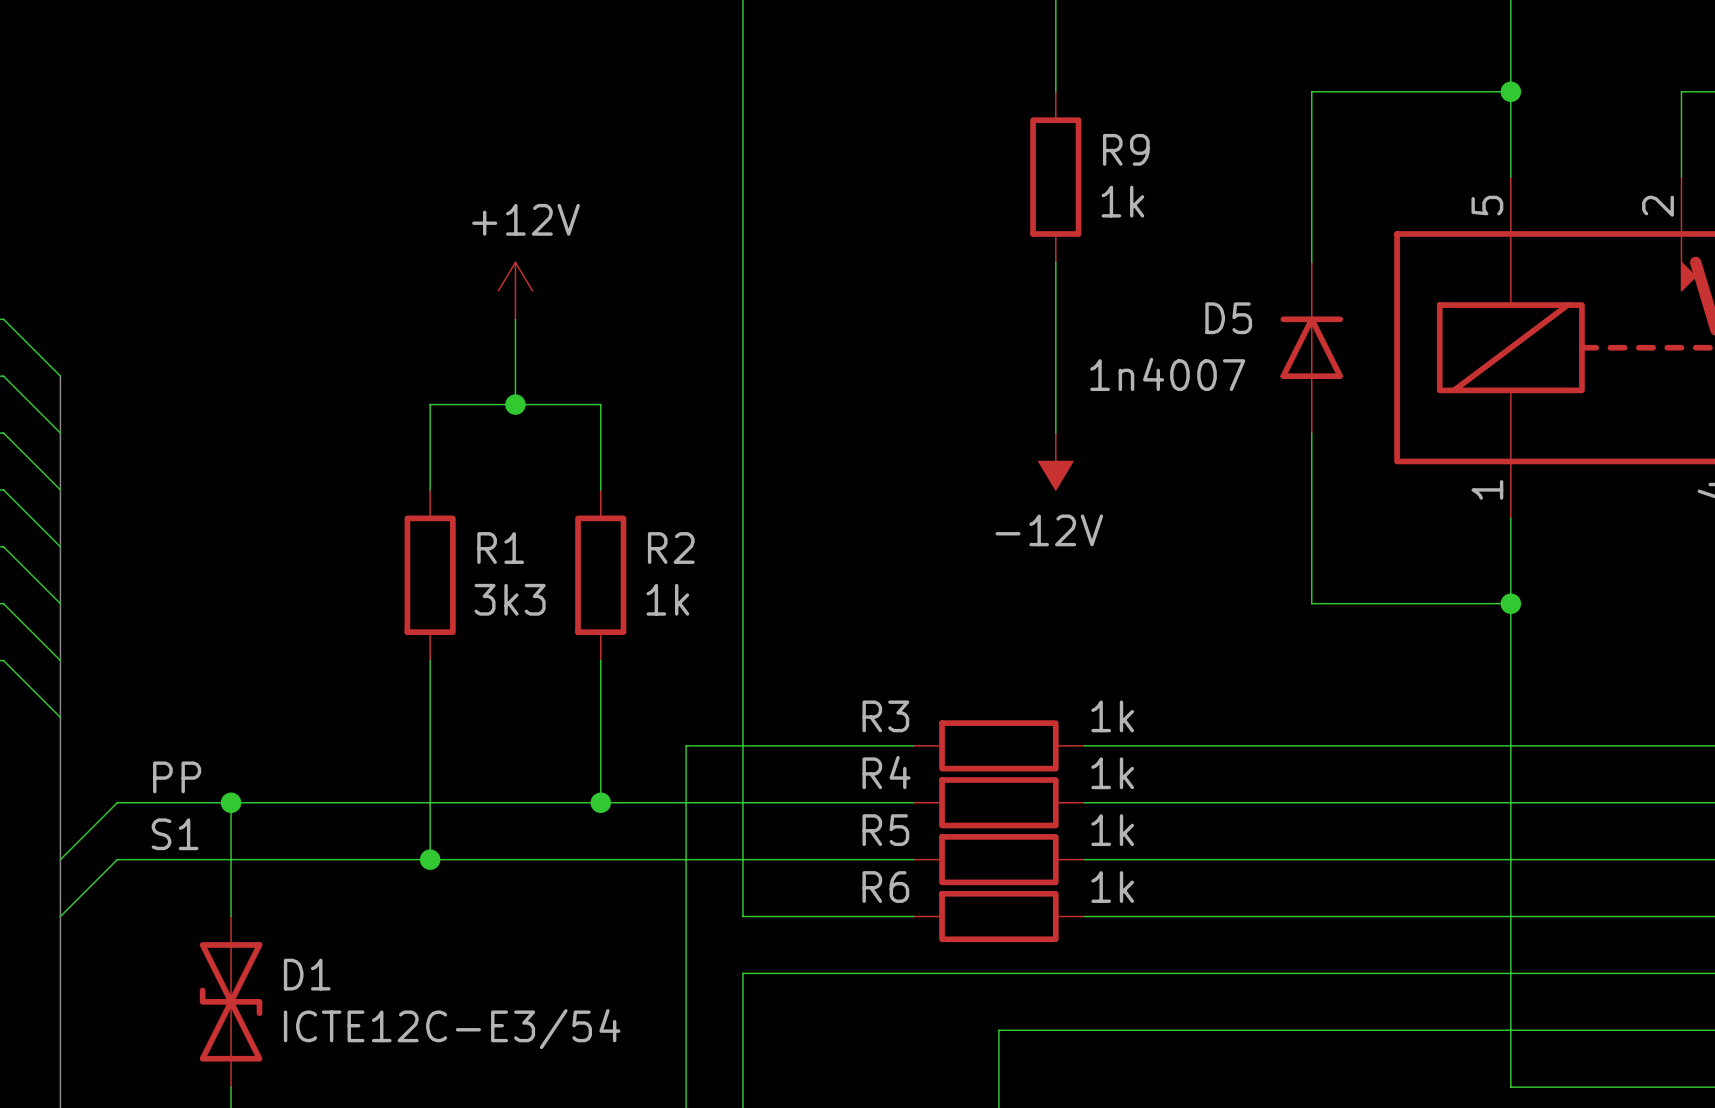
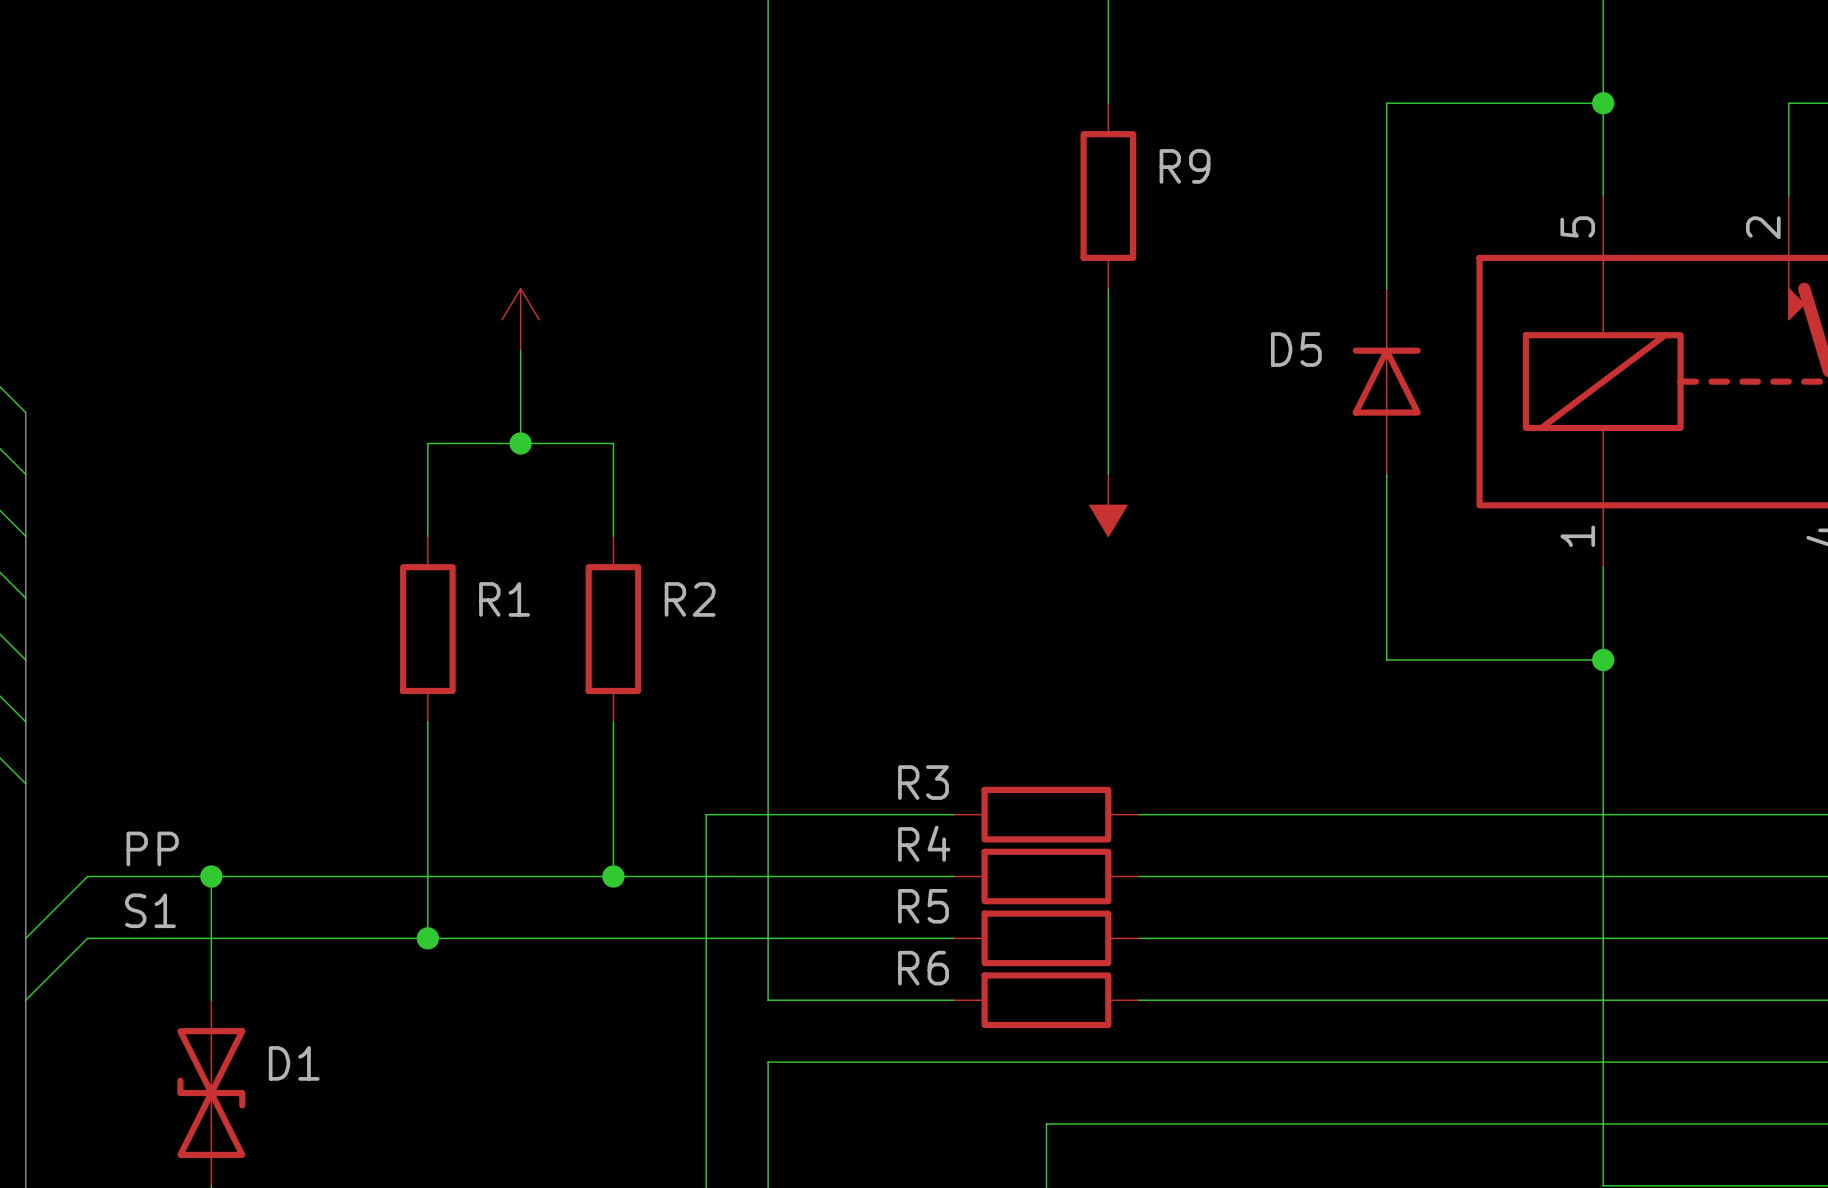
R9 value: 1k (1122, 201) -> none
power symbol text: +12V (526, 219) -> none
D5 value: 1n4007 (1167, 374) -> none
power symbol text: -12V (1049, 530) -> none
R1 value: 3k3 (510, 599) -> none
R2 value: 1k (667, 599) -> none
R3 value: 1k (1112, 716) -> none
R4 value: 1k (1112, 773) -> none
R5 value: 1k (1112, 830) -> none
R6 value: 1k (1112, 887) -> none
D1 value: ICTE12C-E3/54 (452, 1029) -> none

